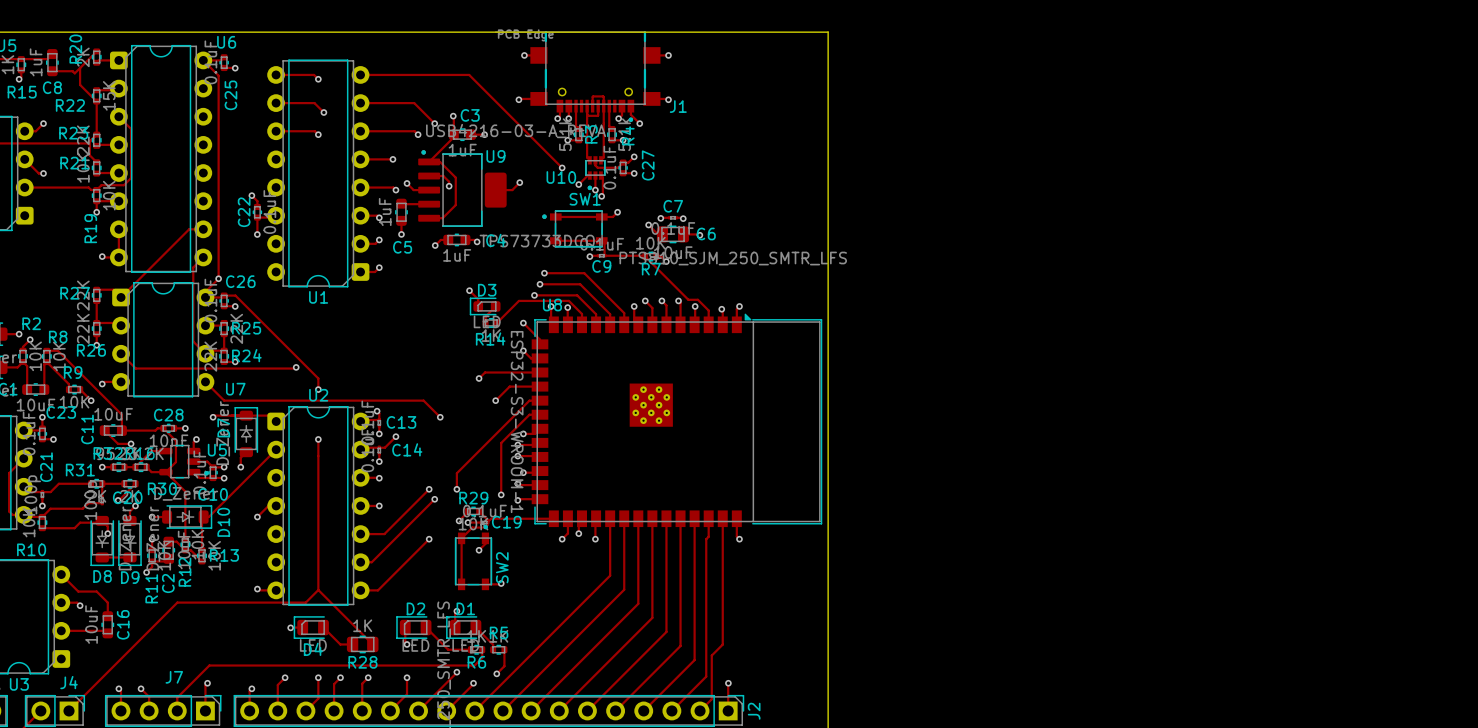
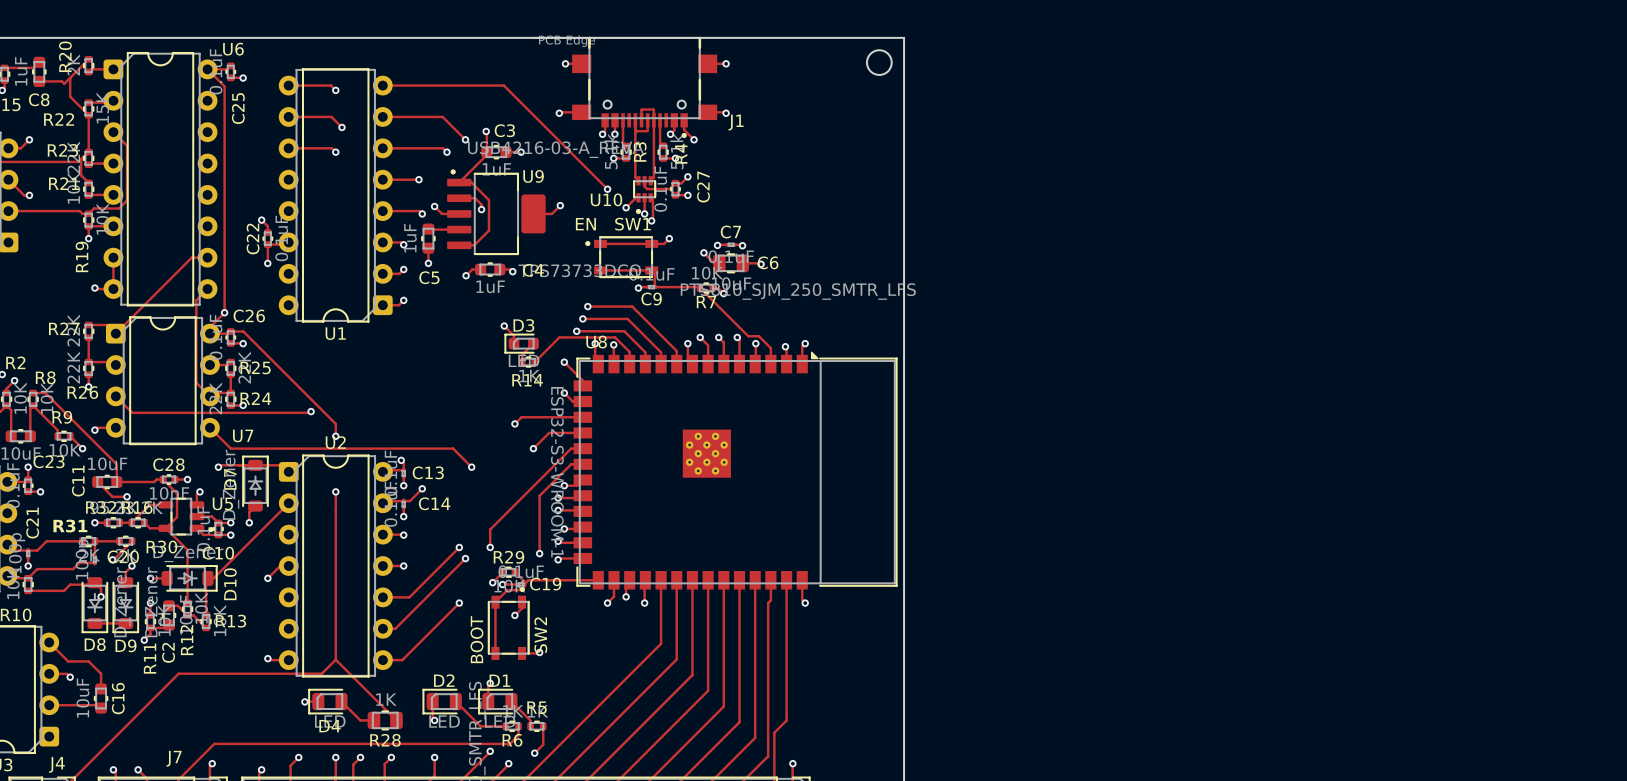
round board edge: none -> [866, 49, 893, 76]
text: none -> EN (585, 224)
text: none -> BOOT (476, 639)

